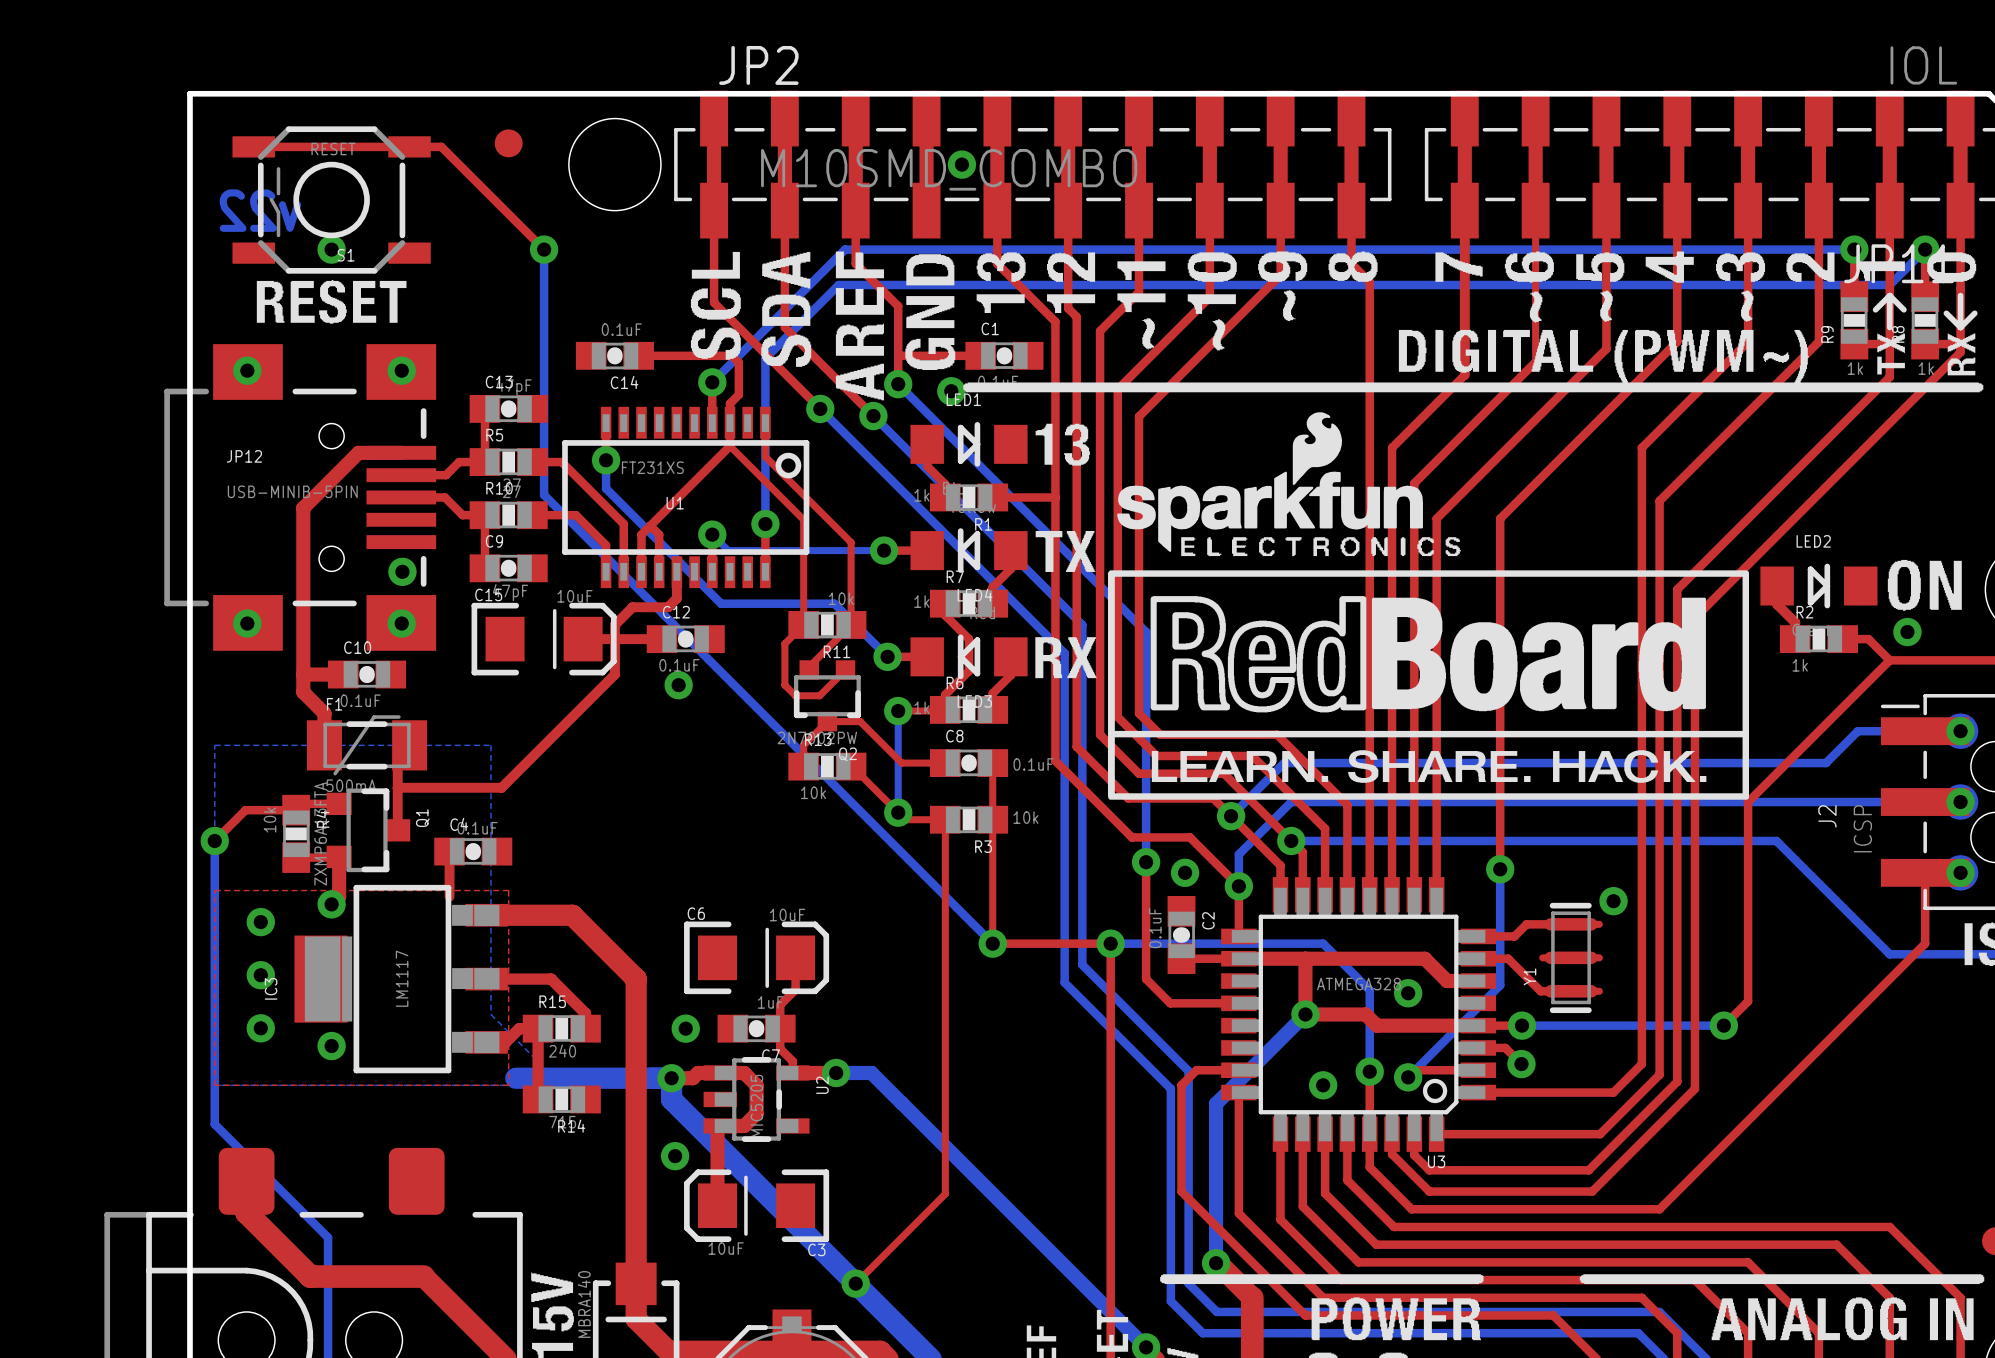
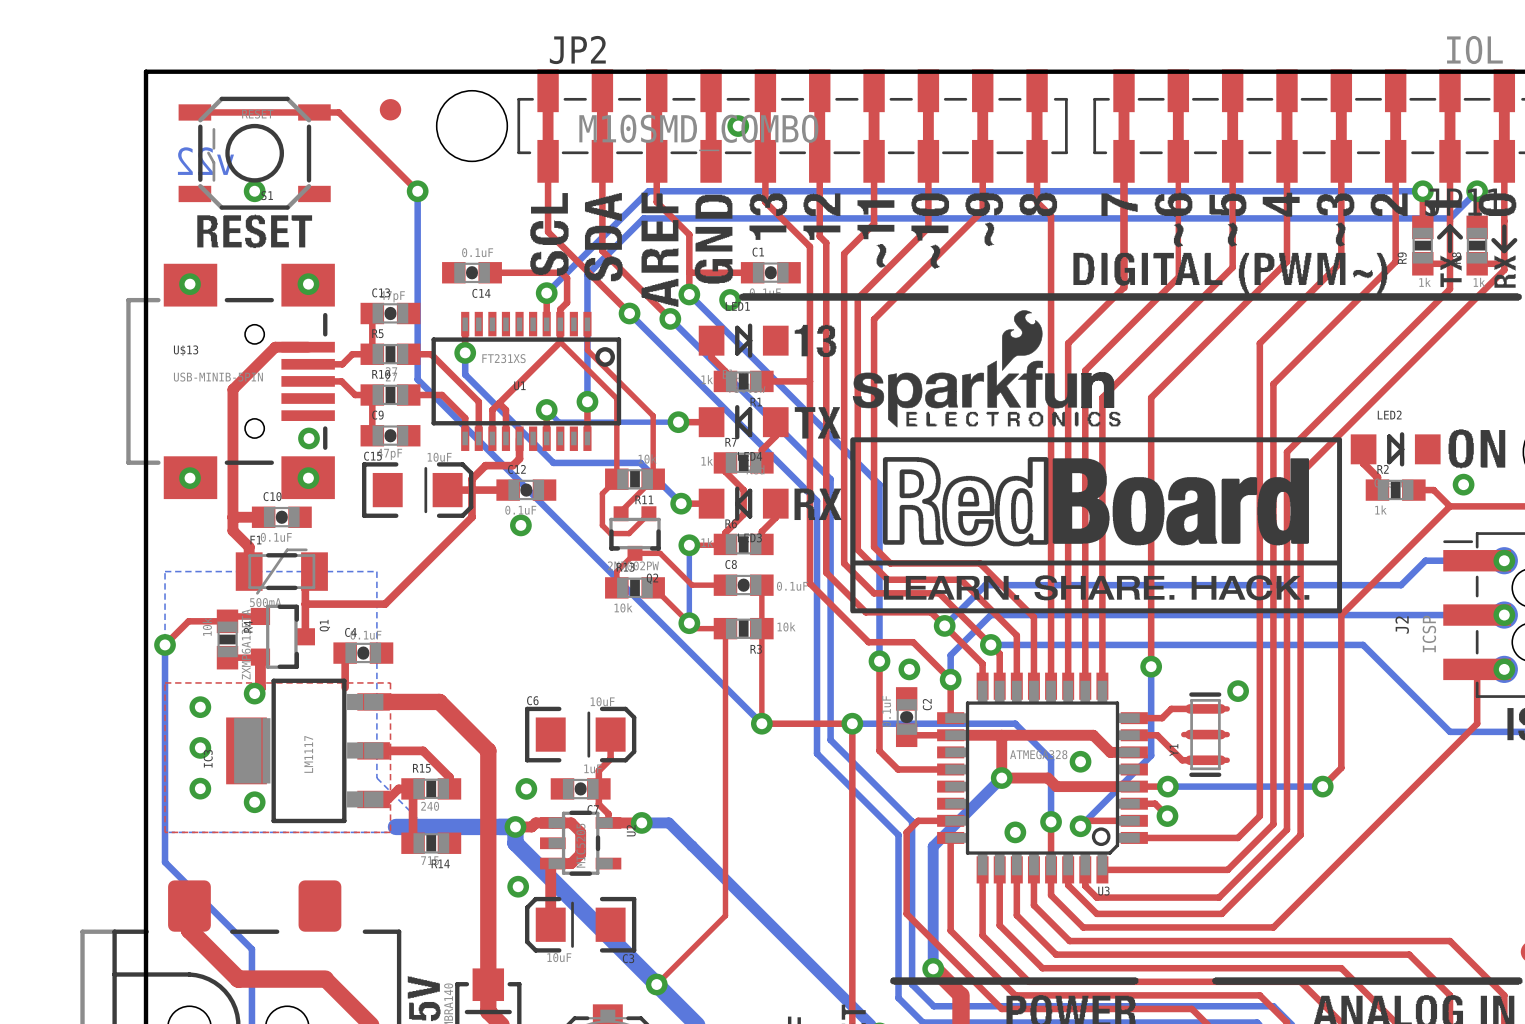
drawing shape: [1292, 412, 1343, 485] -> [1002, 310, 1043, 371]
JP12 name: JP12 (244, 456) -> U$13 (186, 350)
drawing shape: [1117, 471, 1423, 552] -> [852, 360, 1114, 428]

